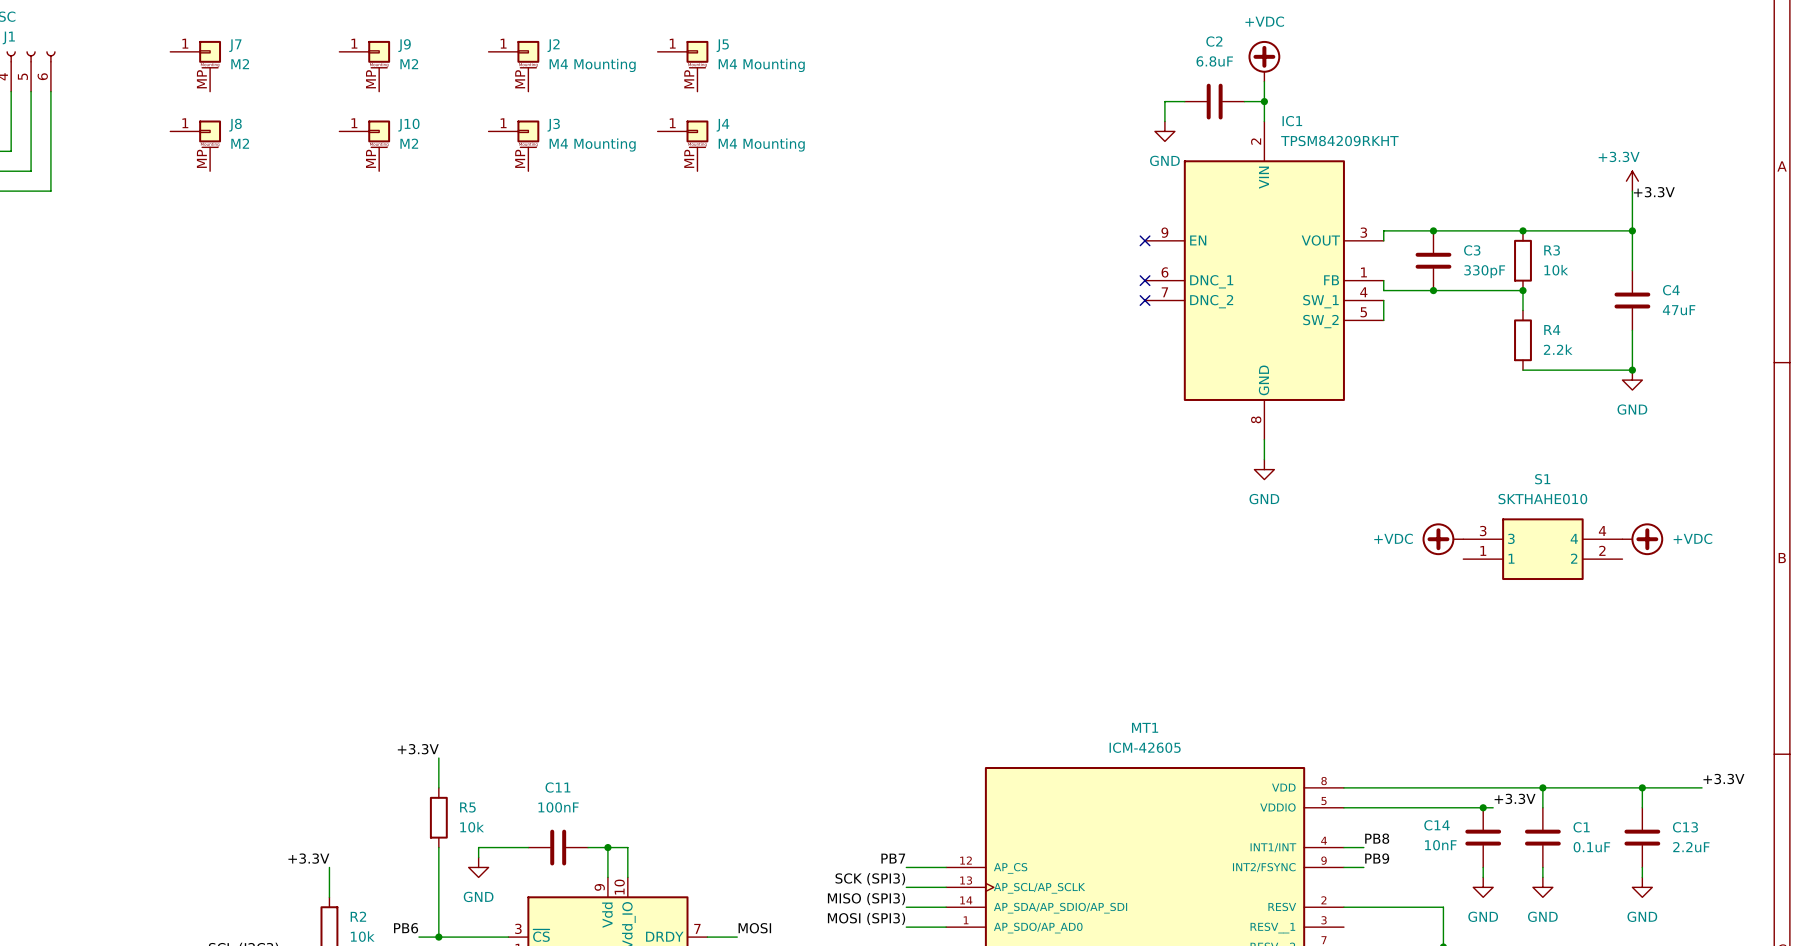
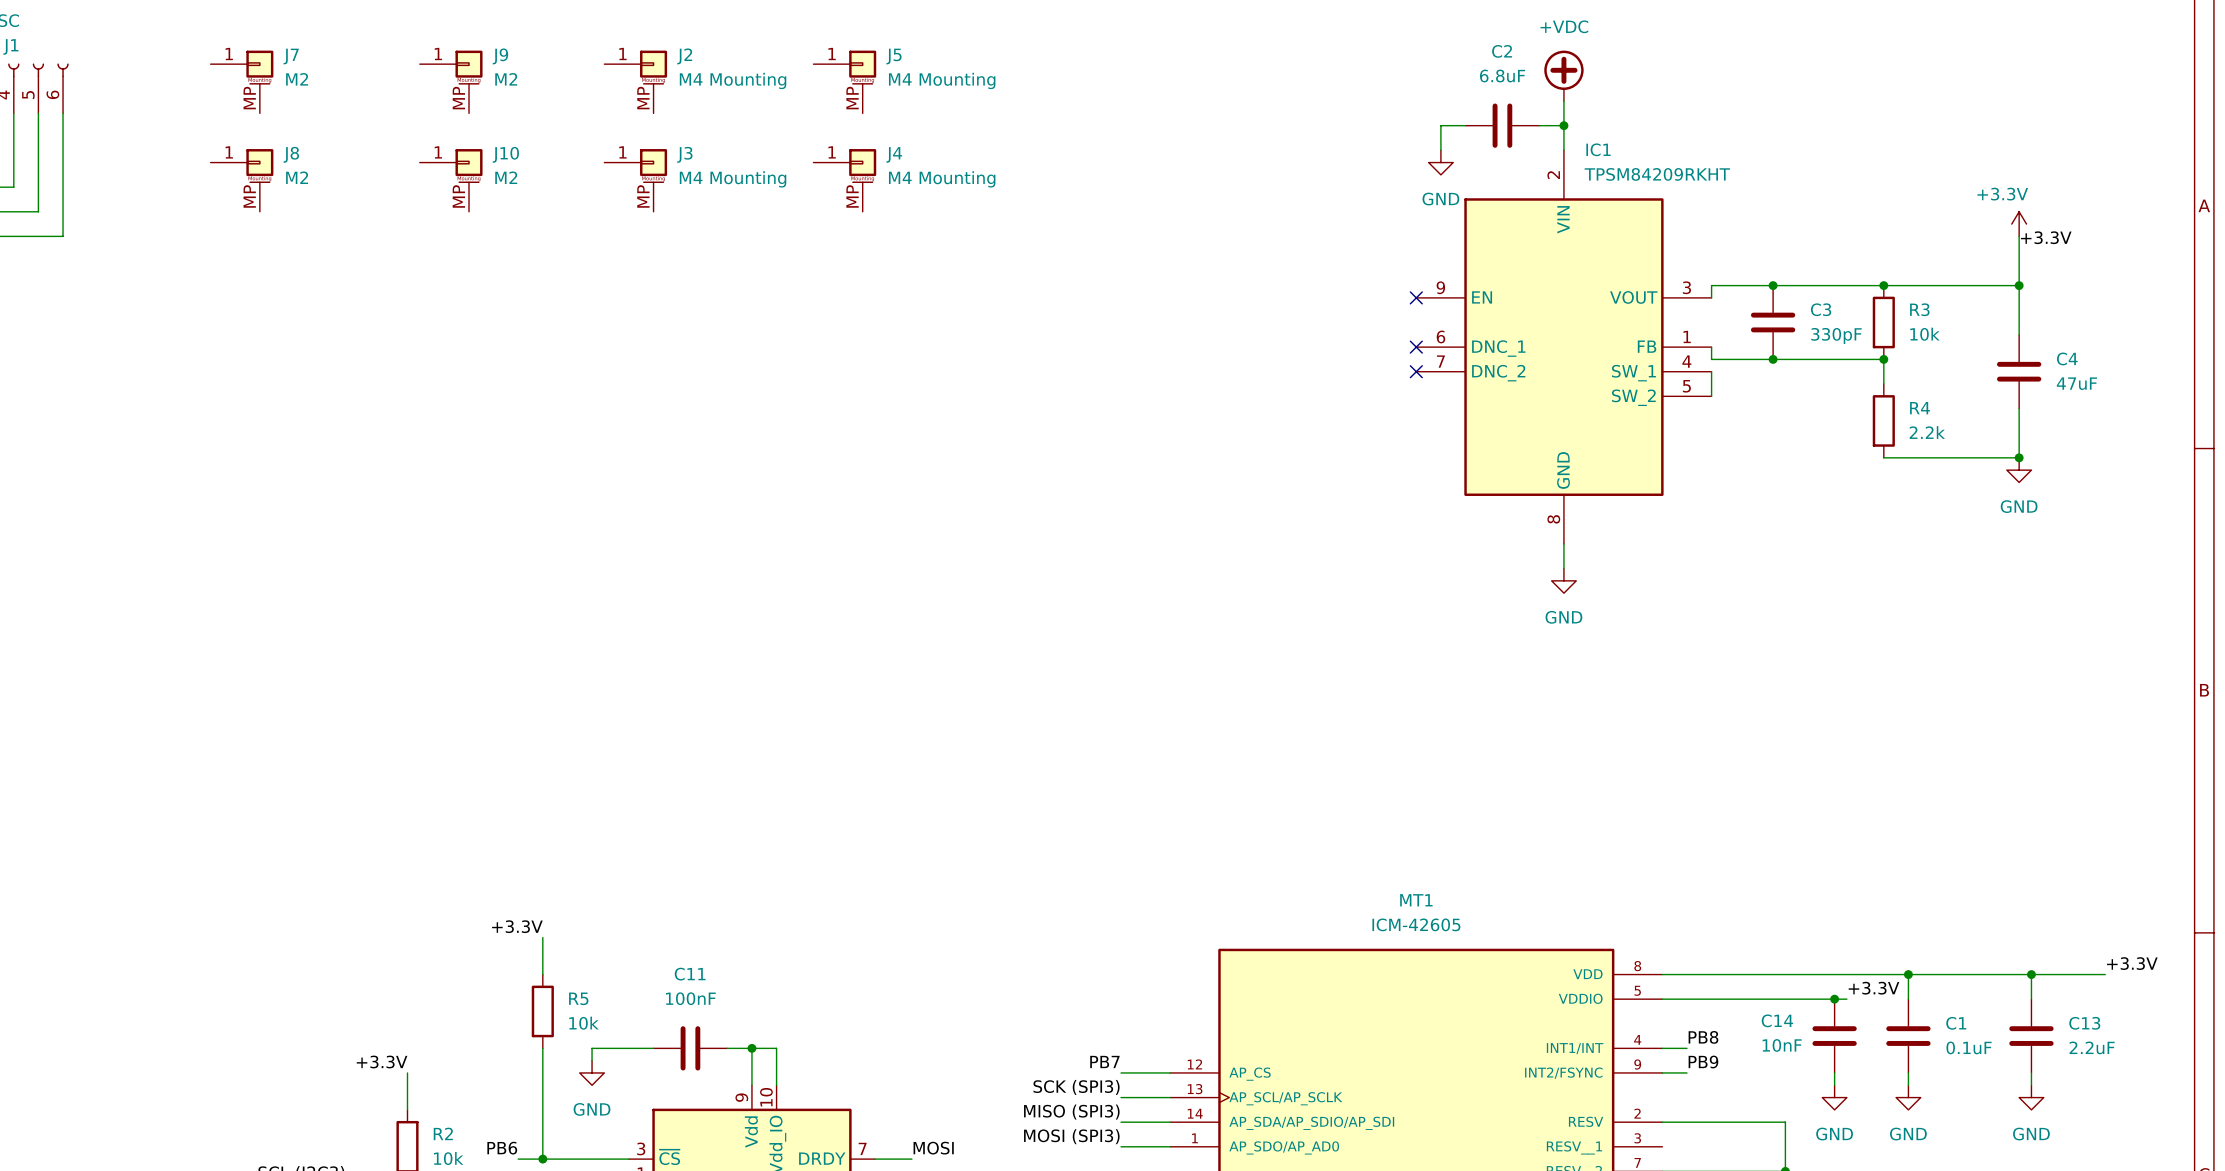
power symbol: +VDC (1442, 539) -> none
power symbol: +VDC (1642, 539) -> none
S1: SKTHAHE010 (1542, 549) -> none

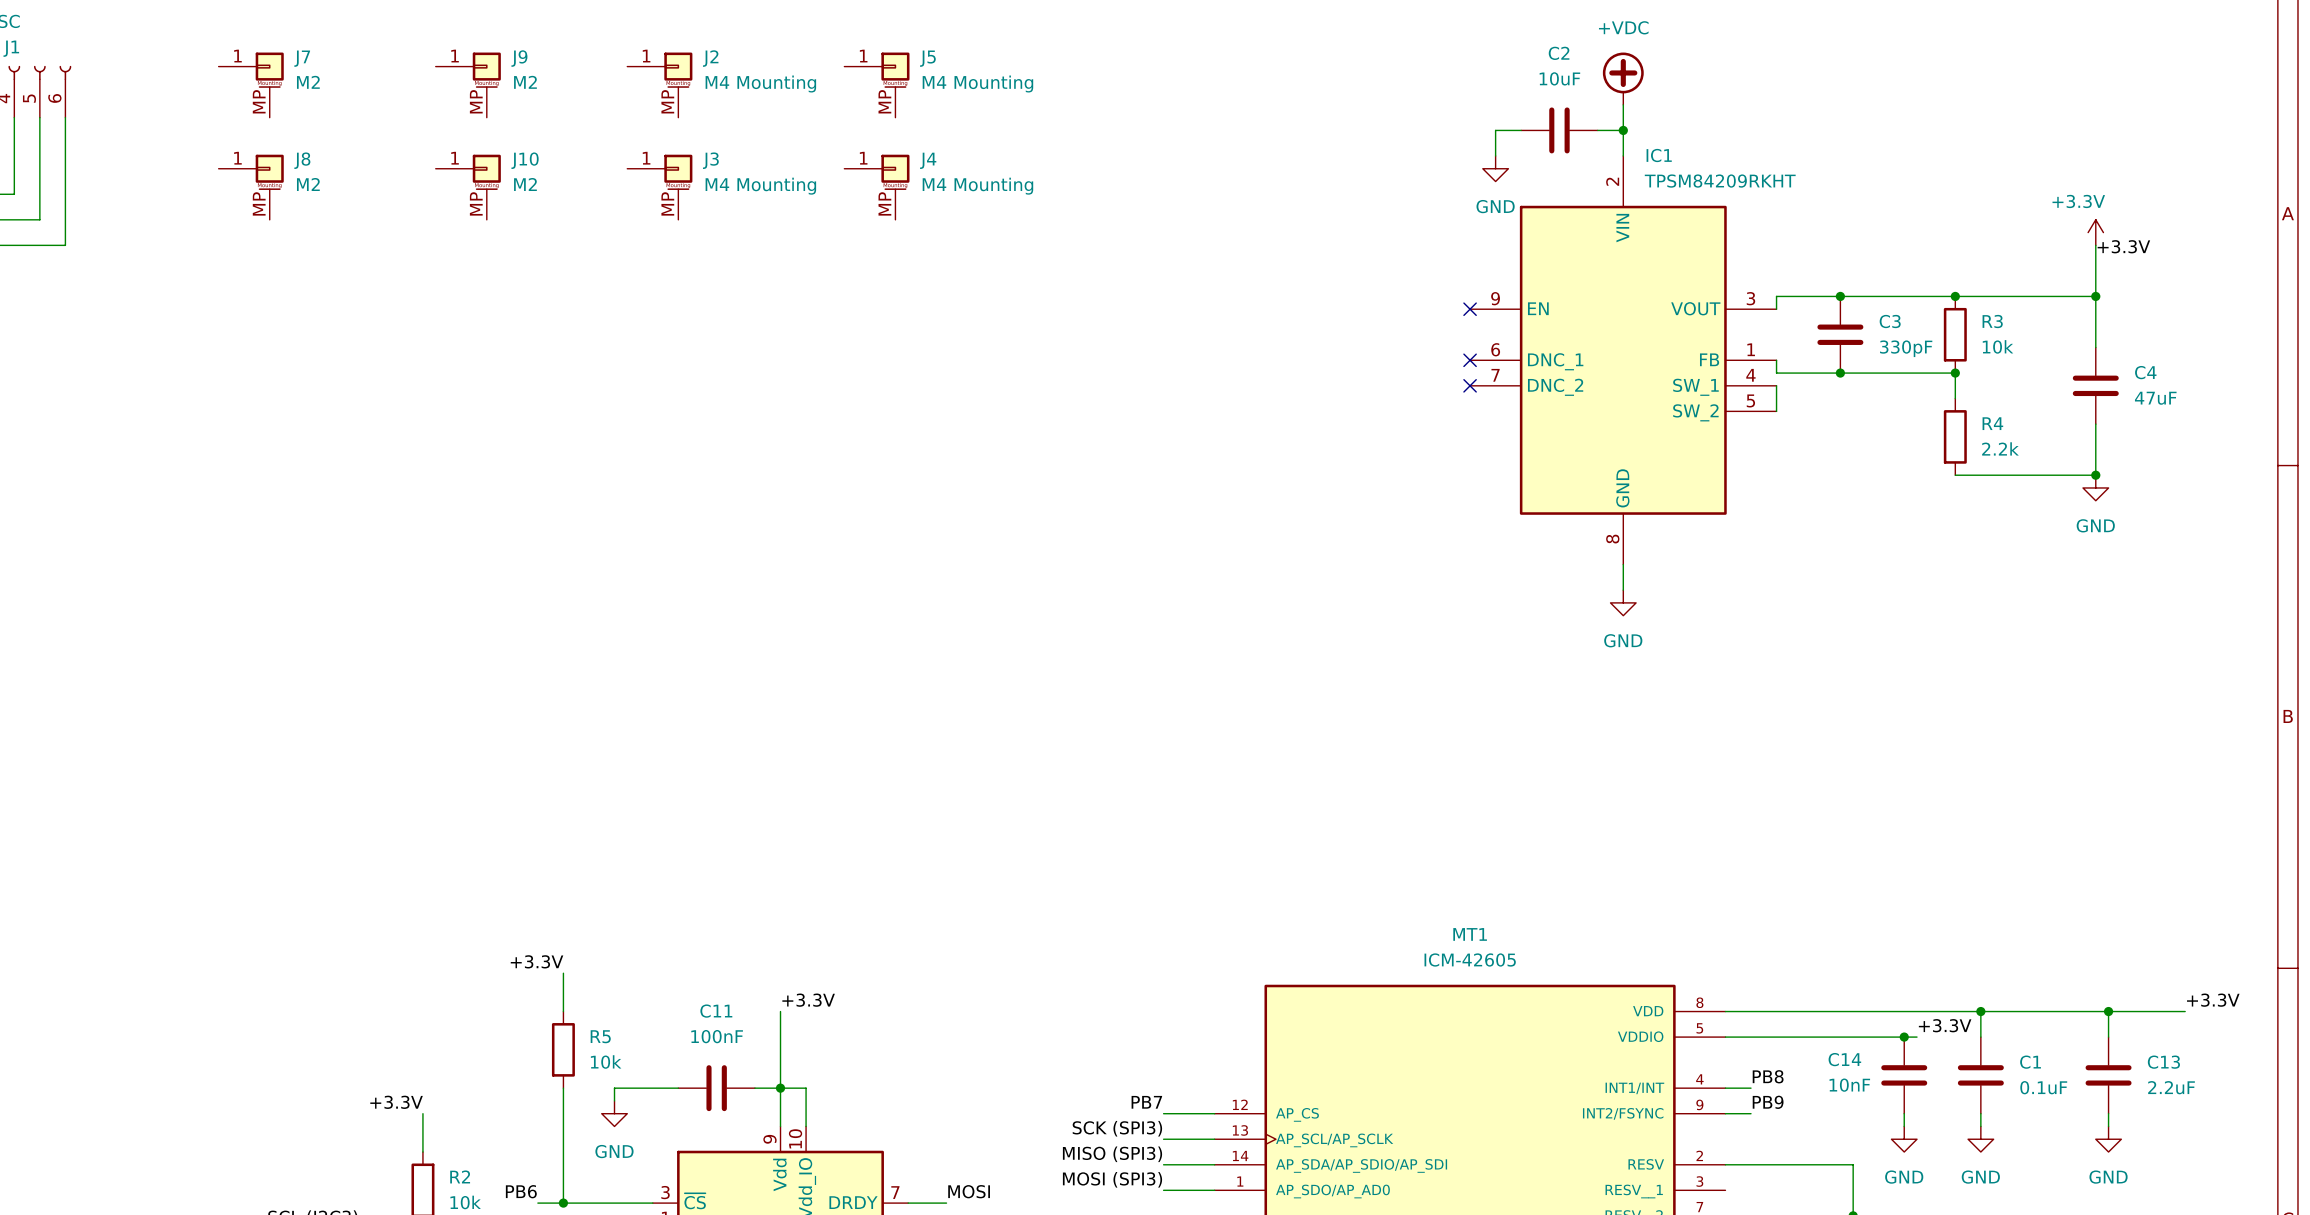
C2 value: 6.8uF (1502, 76) -> 10uF (1559, 78)
label: none -> +3.3V (808, 1000)
wire: none -> (780, 1011) (780, 1088)

